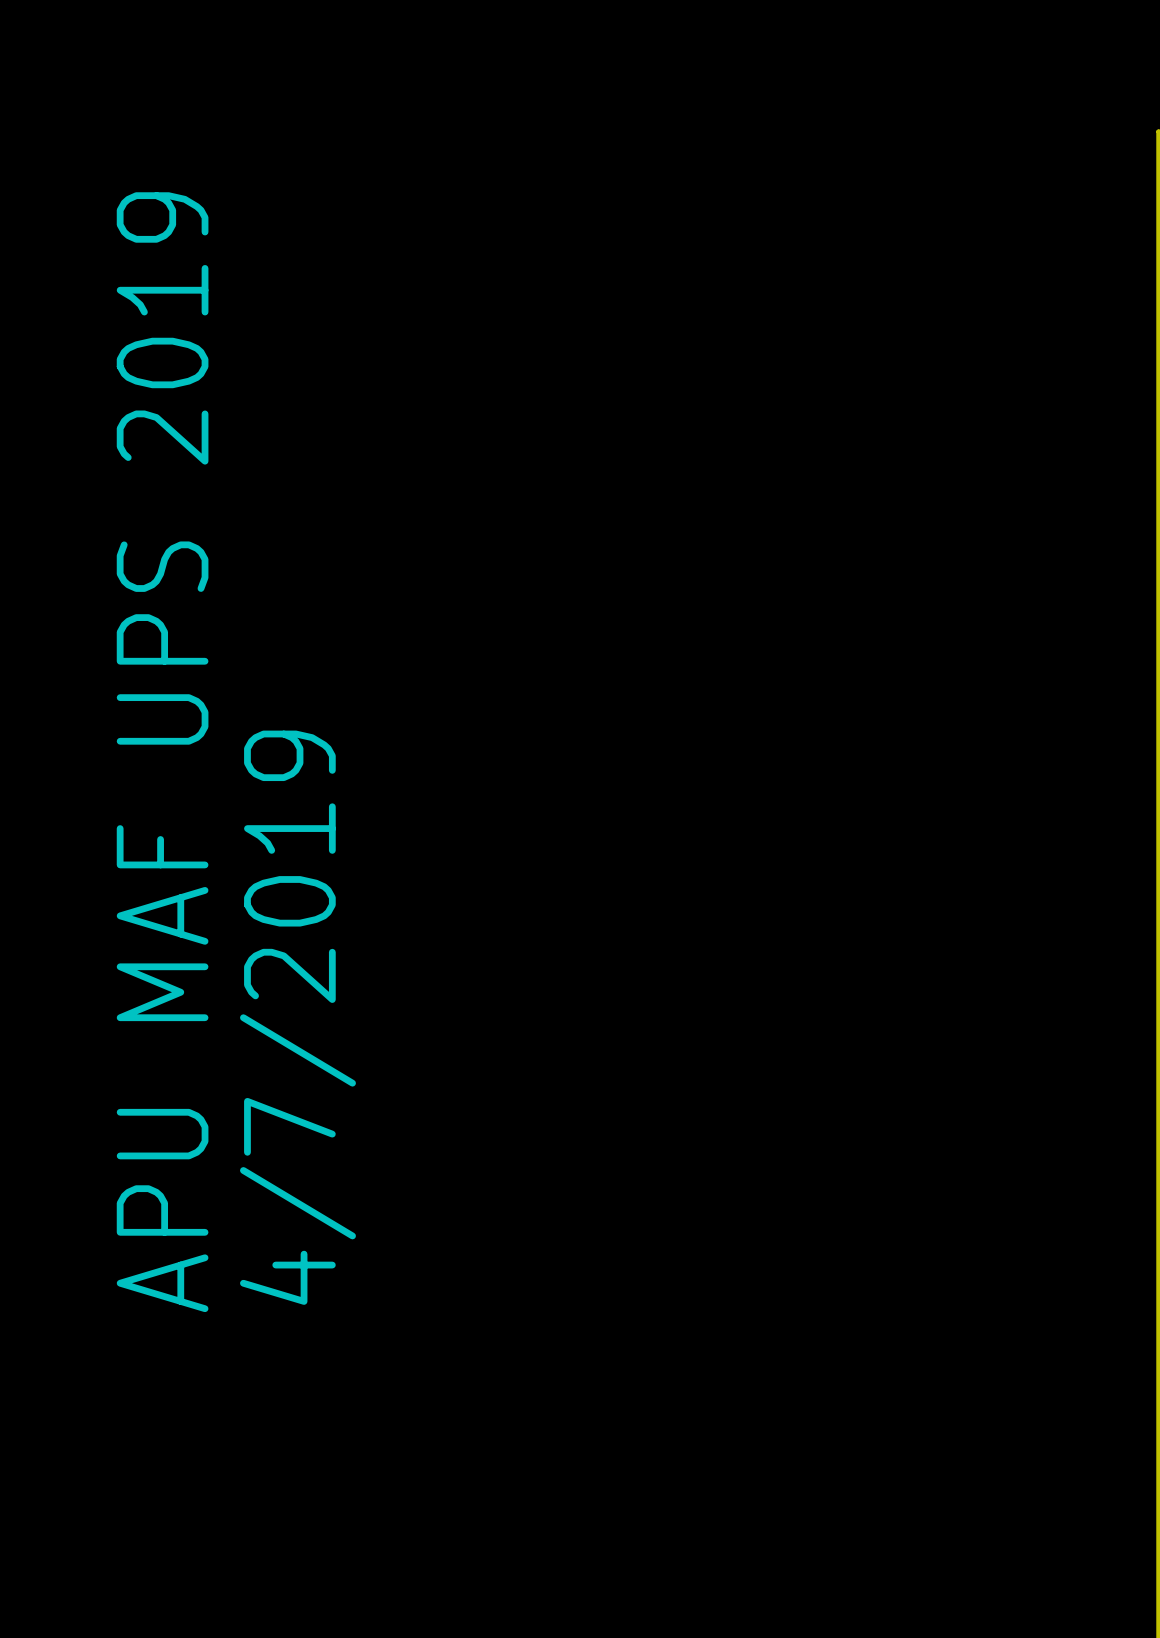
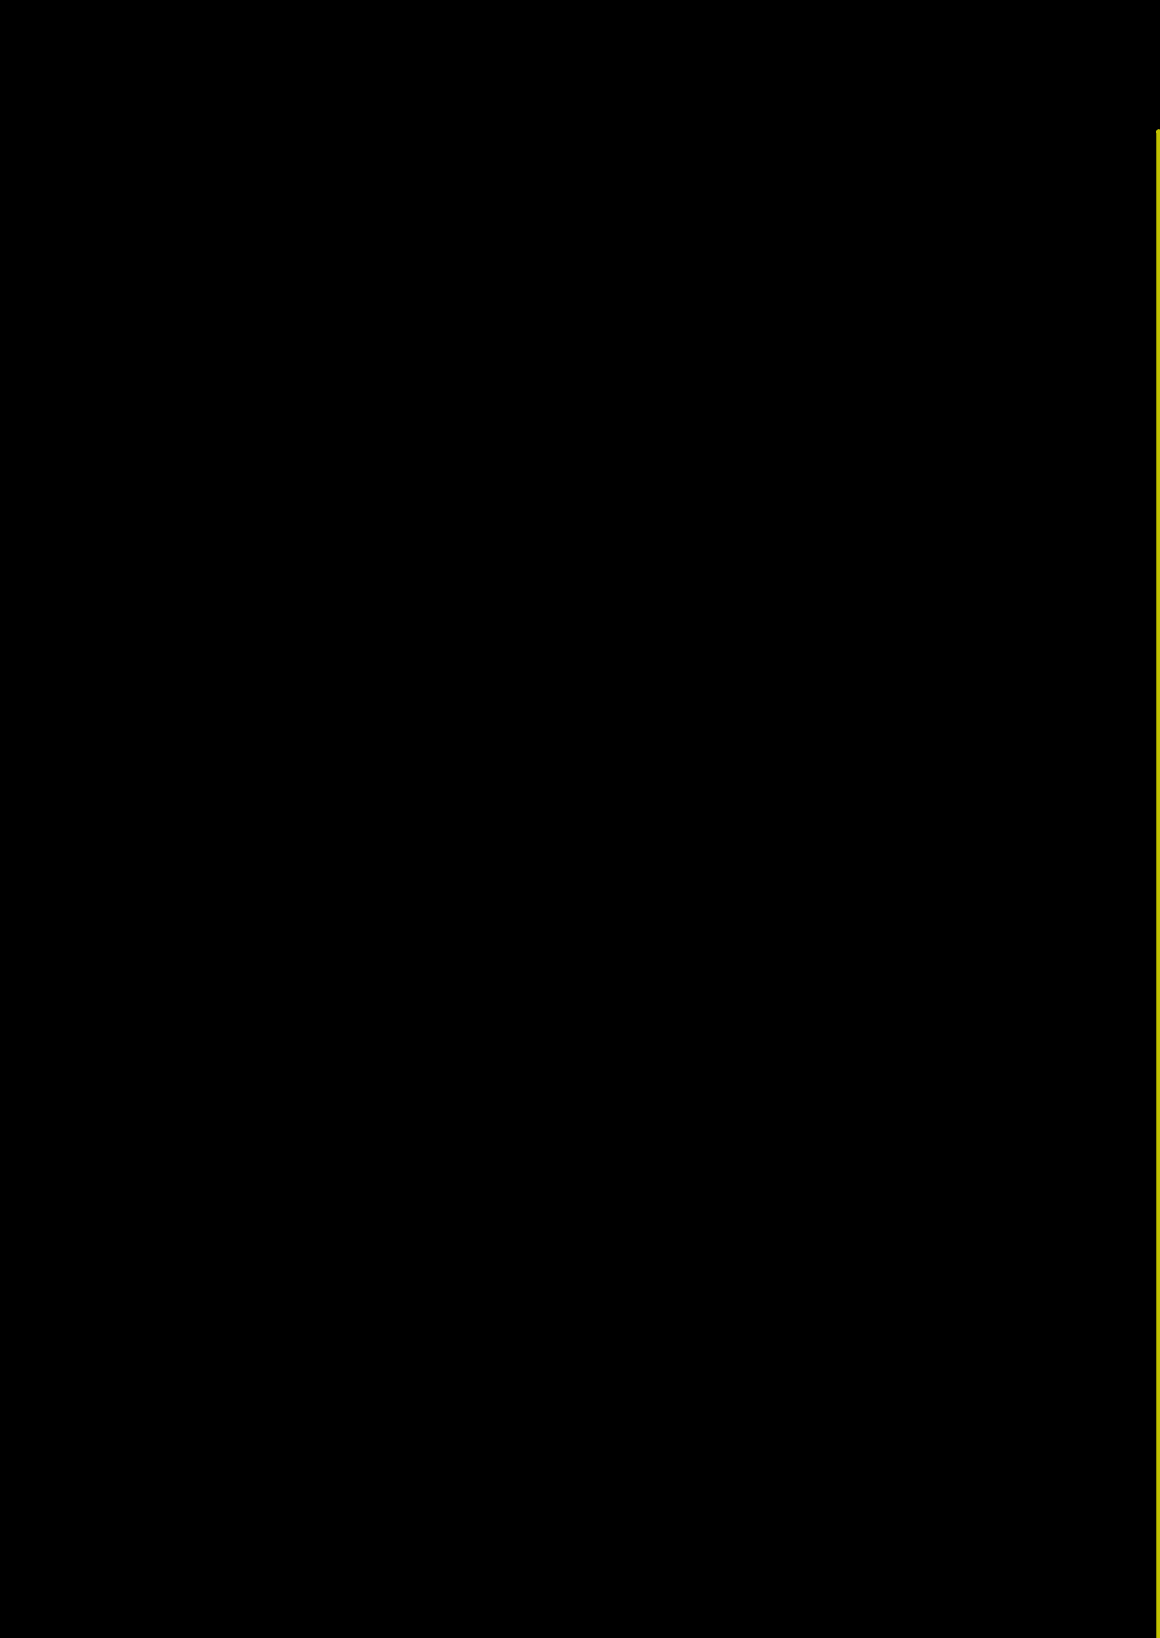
text: APU MAF UPS 2019 (162, 752) -> none
text: 4/7/2019 (297, 1017) -> none

